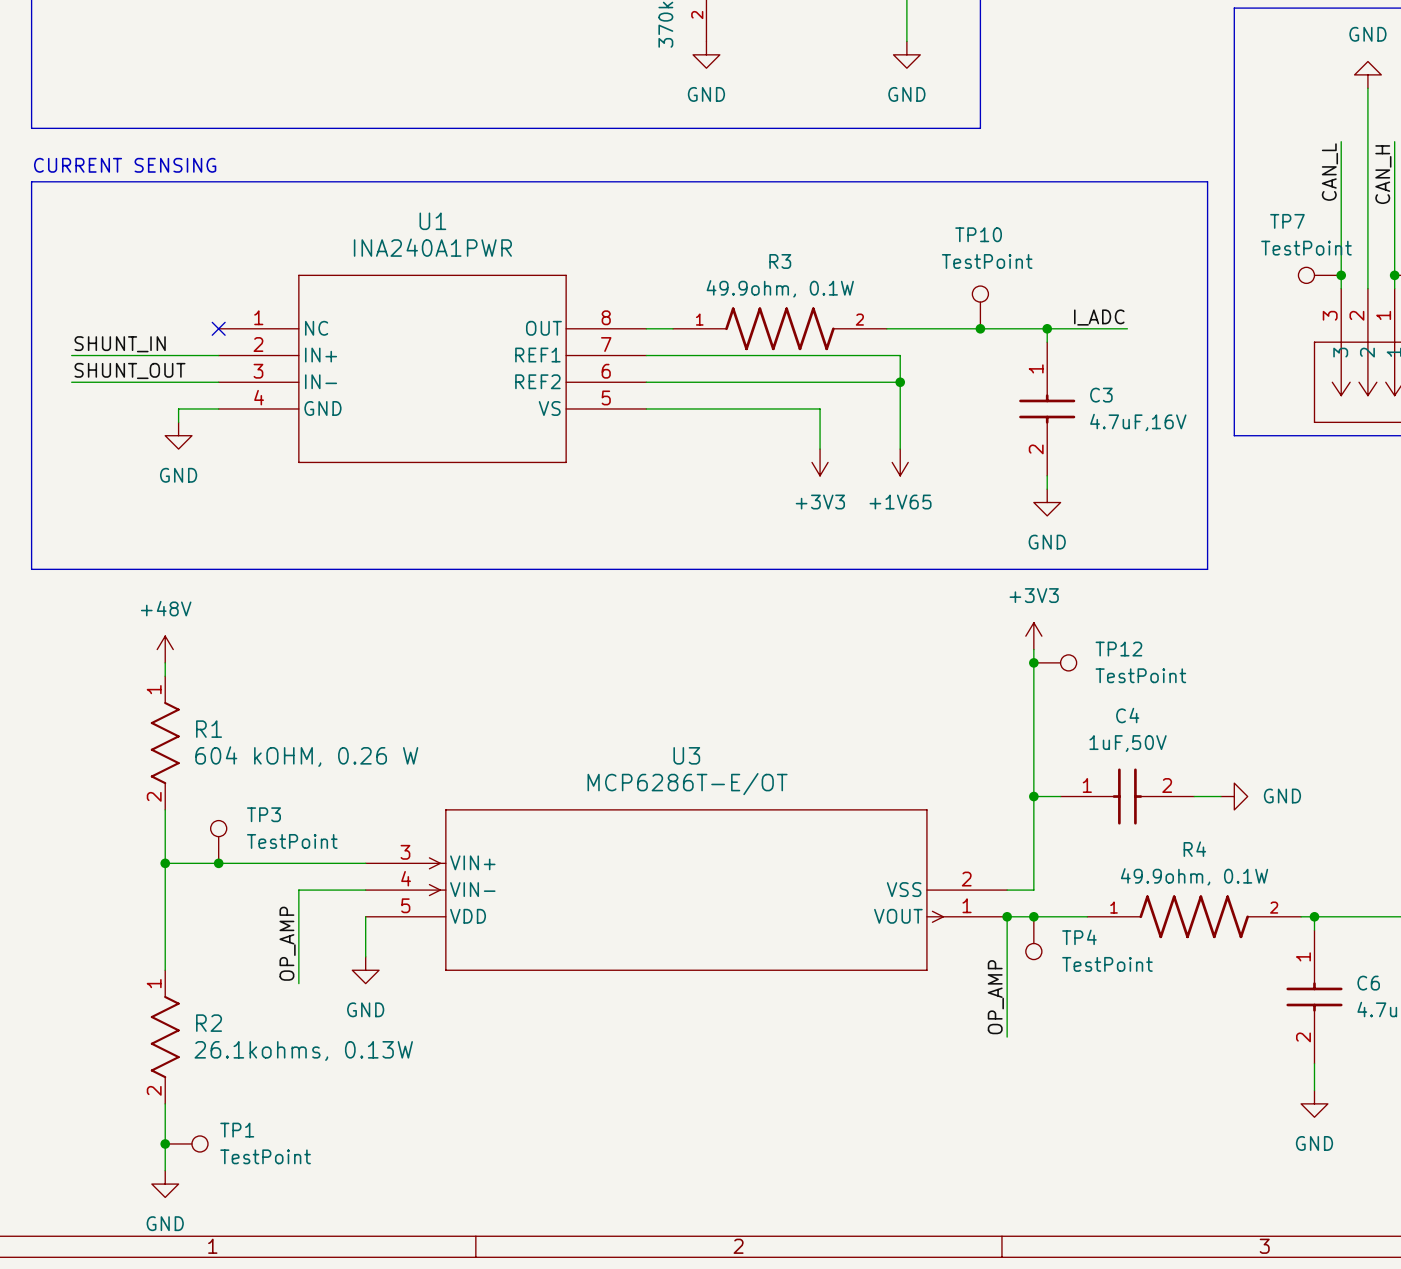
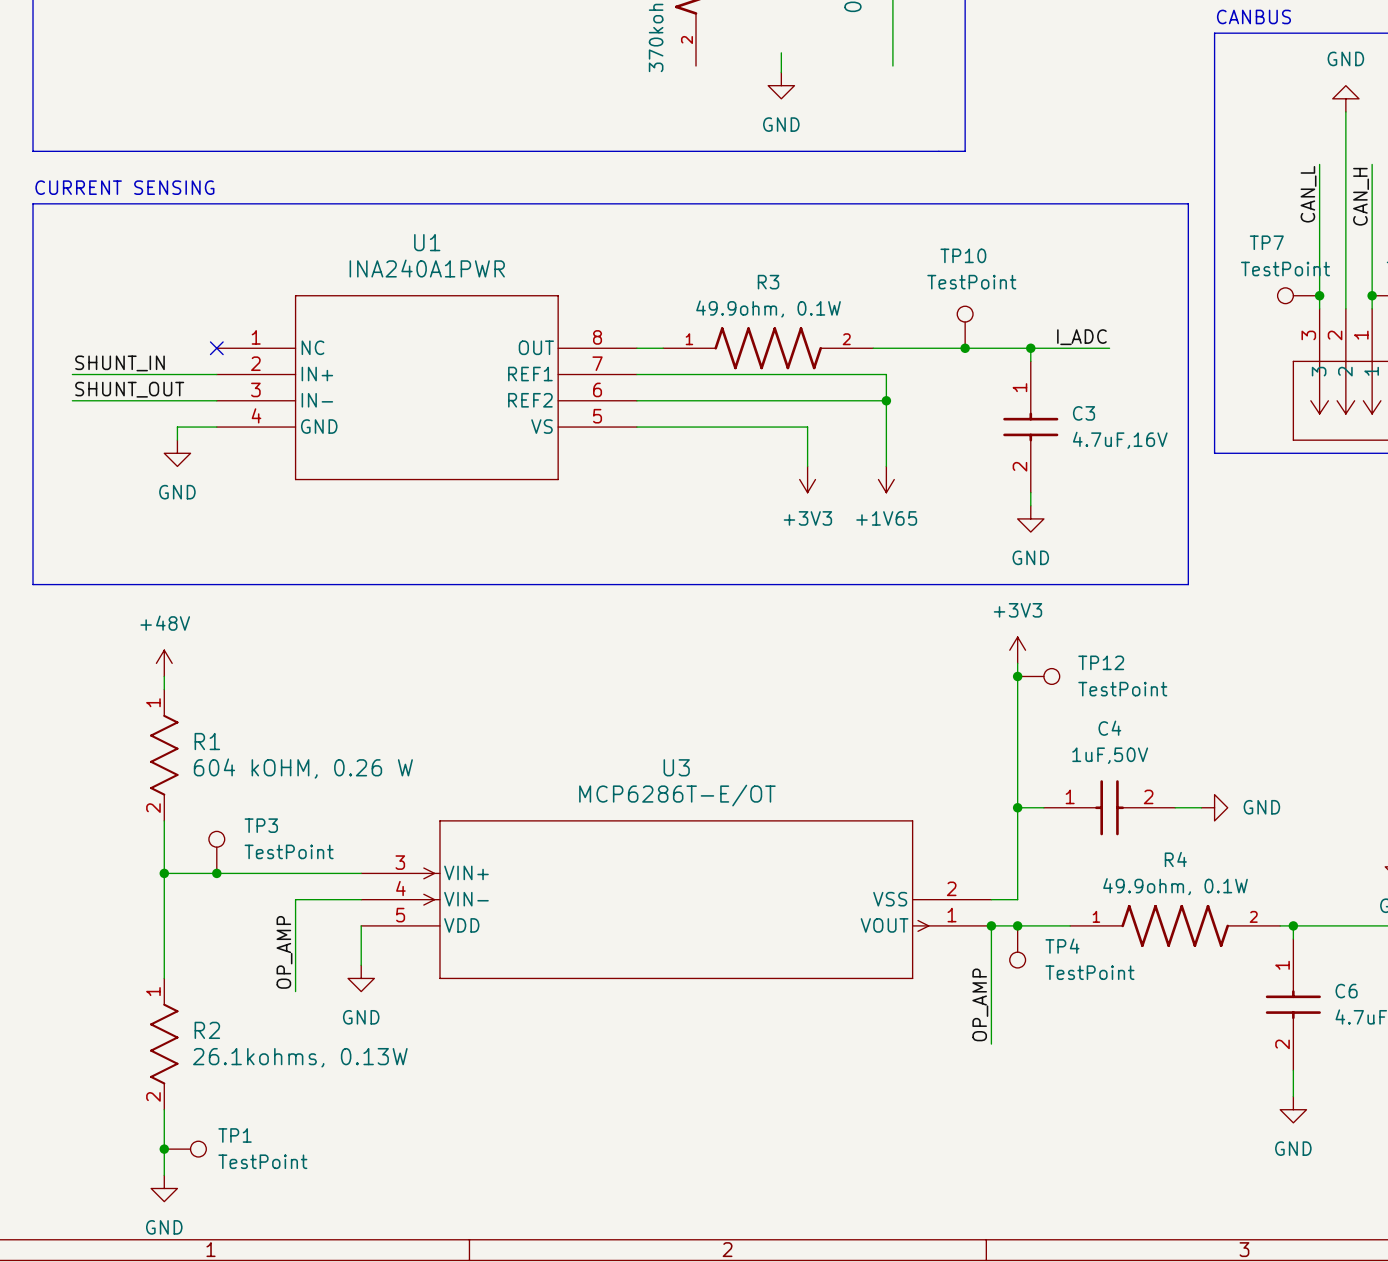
wire: none -> (781, 52) (781, 72)
power symbol: GND (706, 54) -> none
power symbol: GND (906, 54) -> none
power symbol: none -> GND (781, 85)

